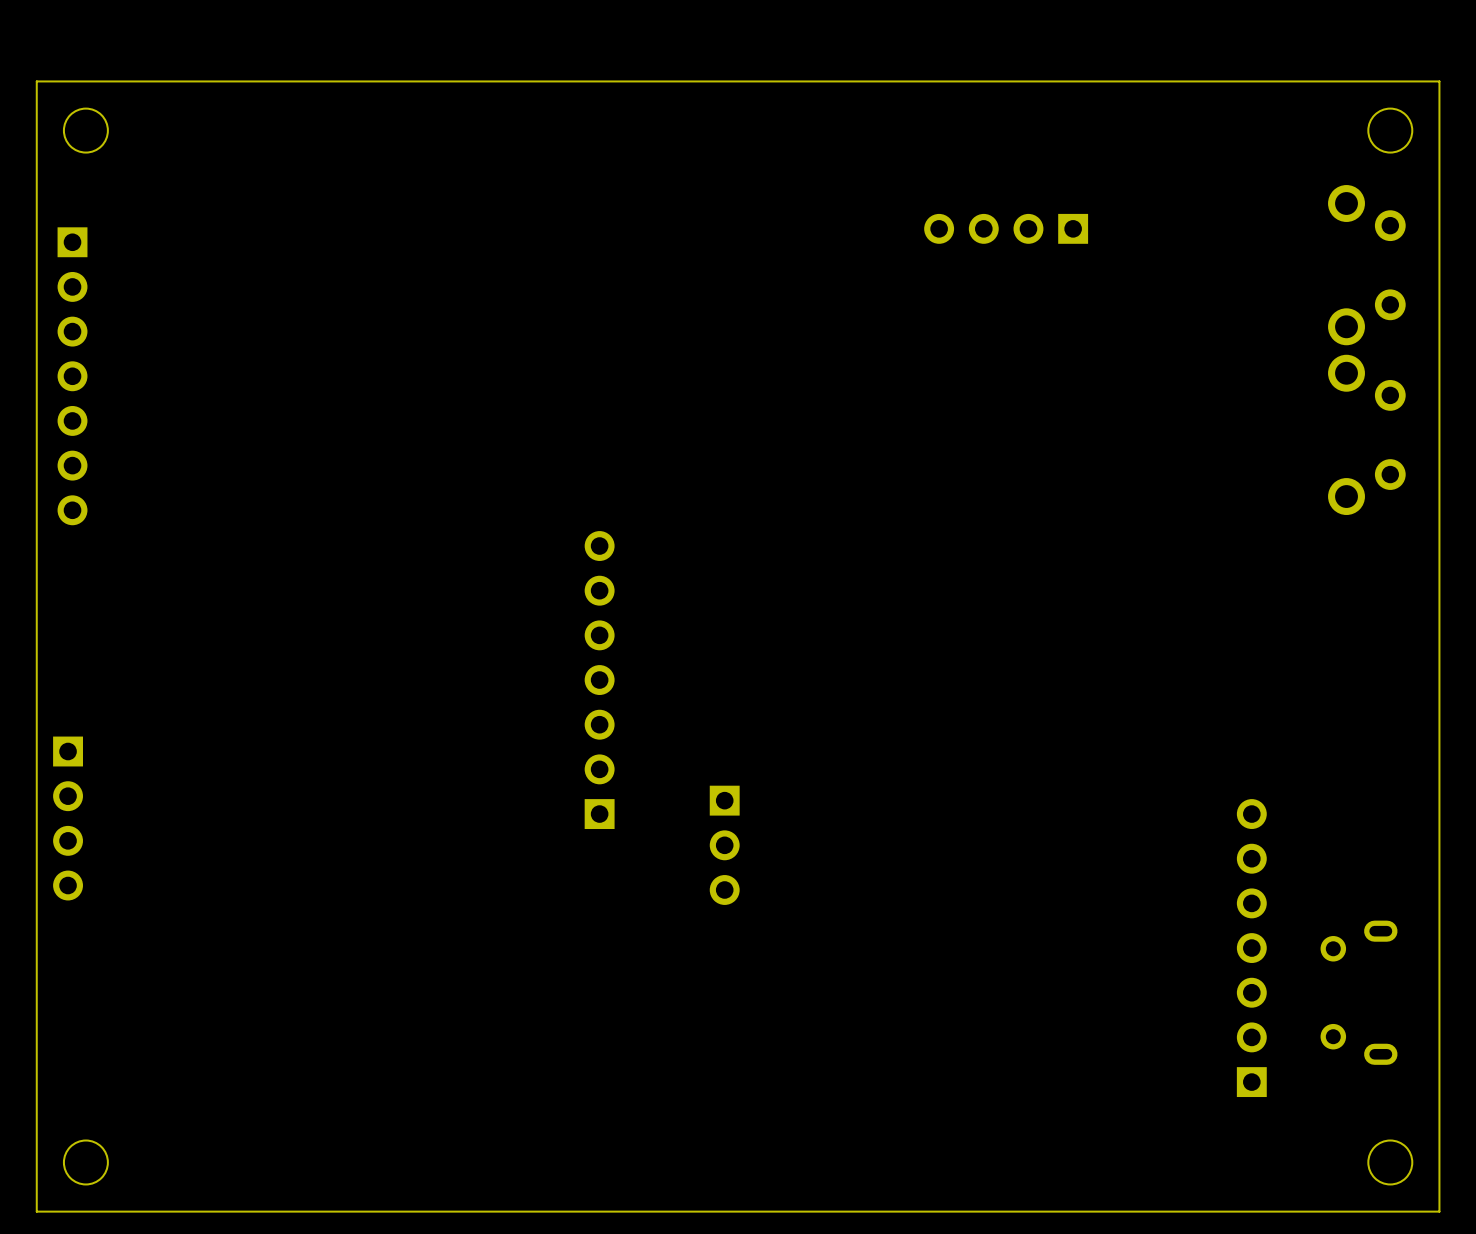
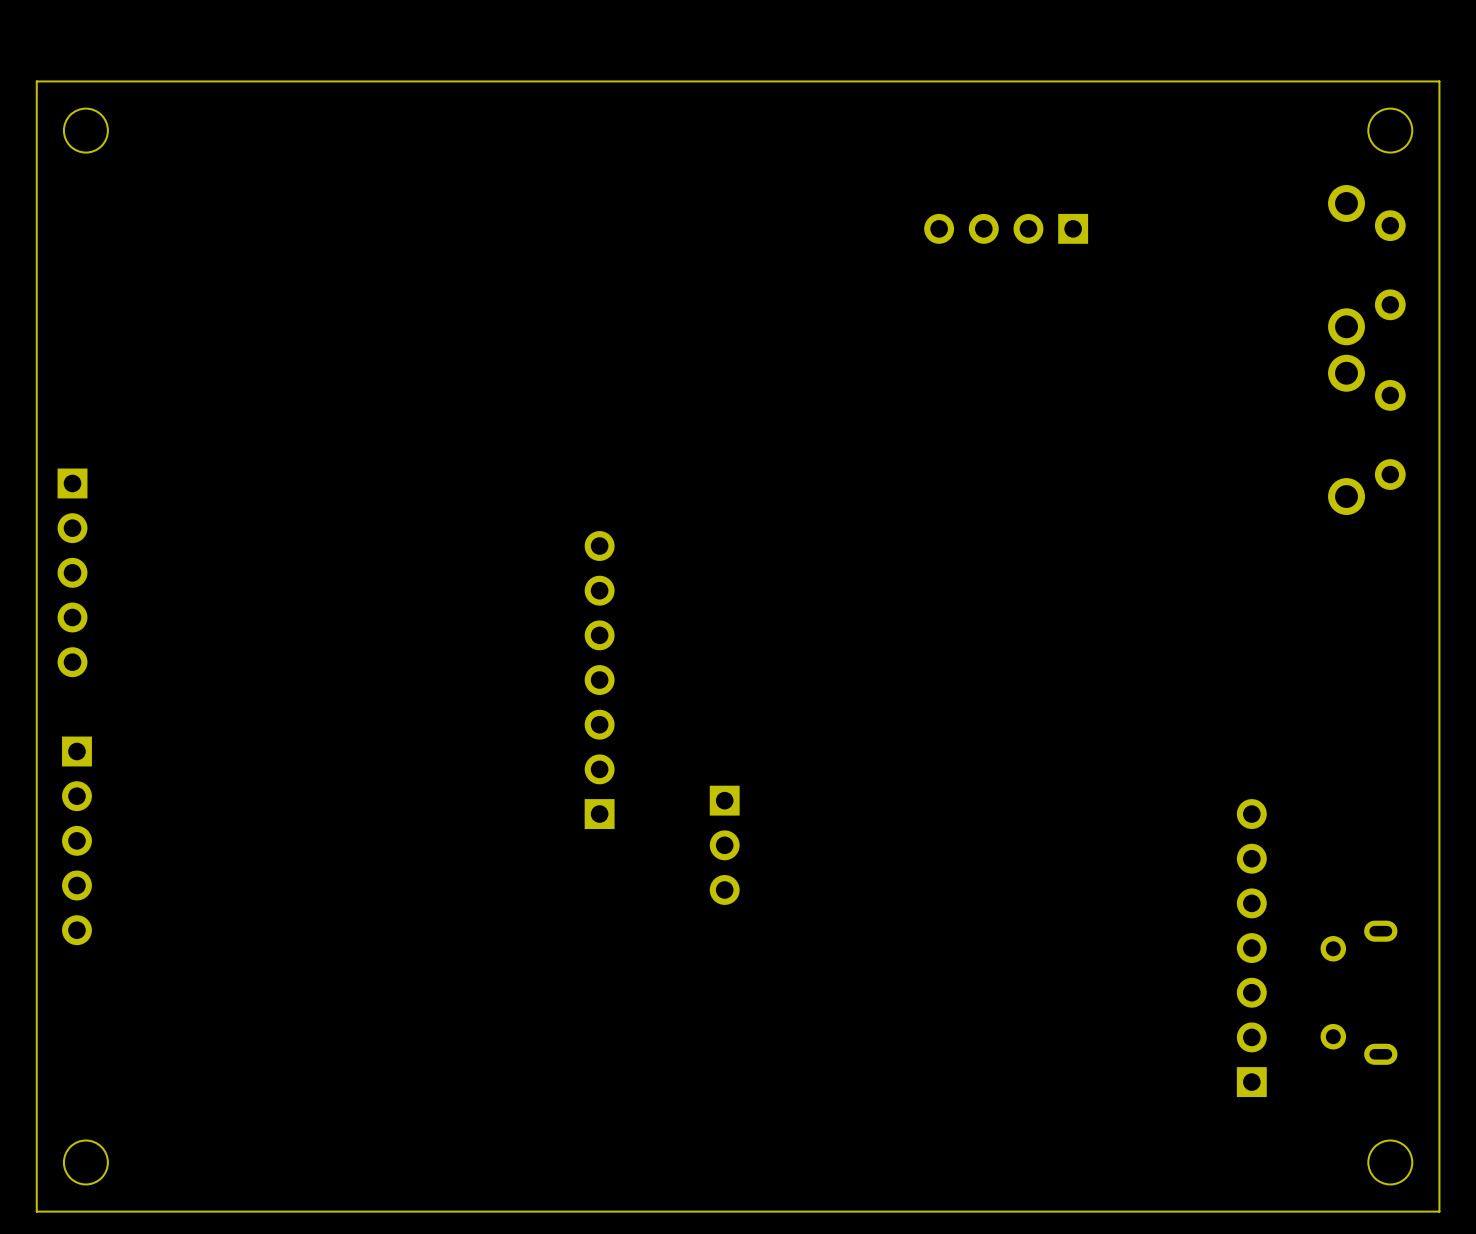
part: (72, 376) -> none
part: none -> (72, 572)
part: (68, 818) -> none
part: none -> (76, 840)

